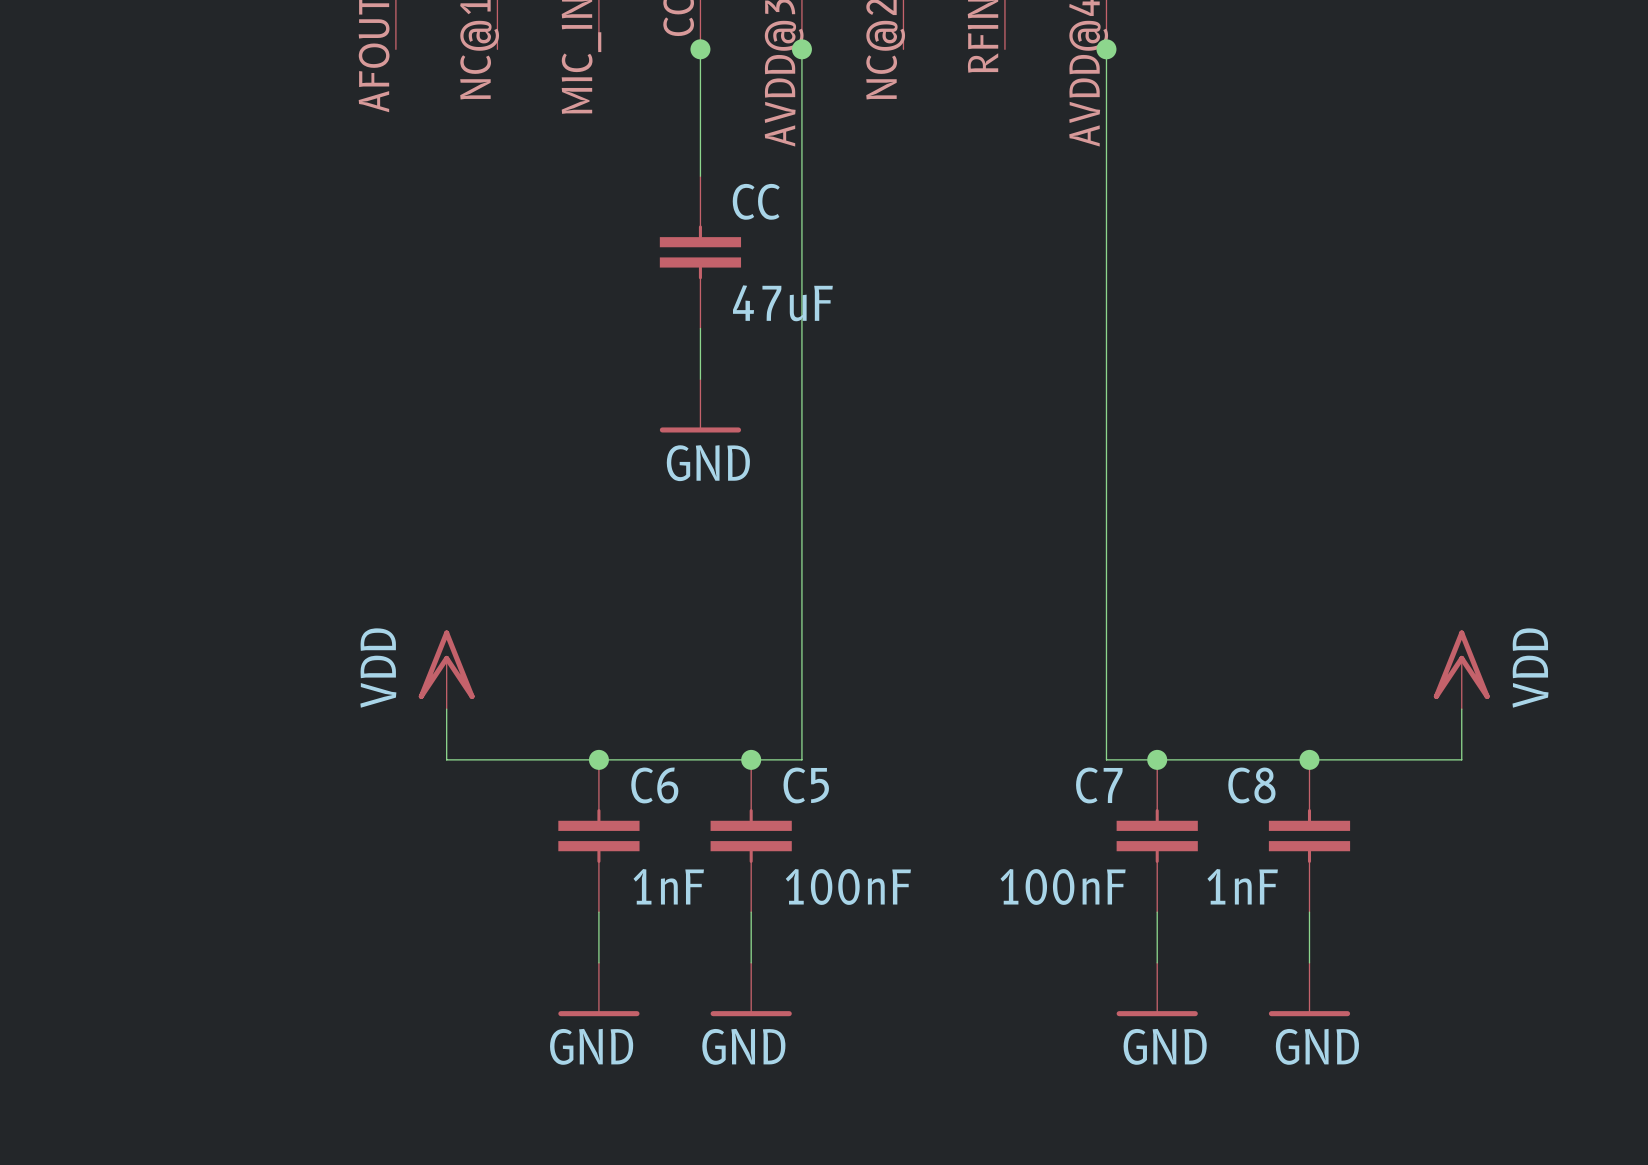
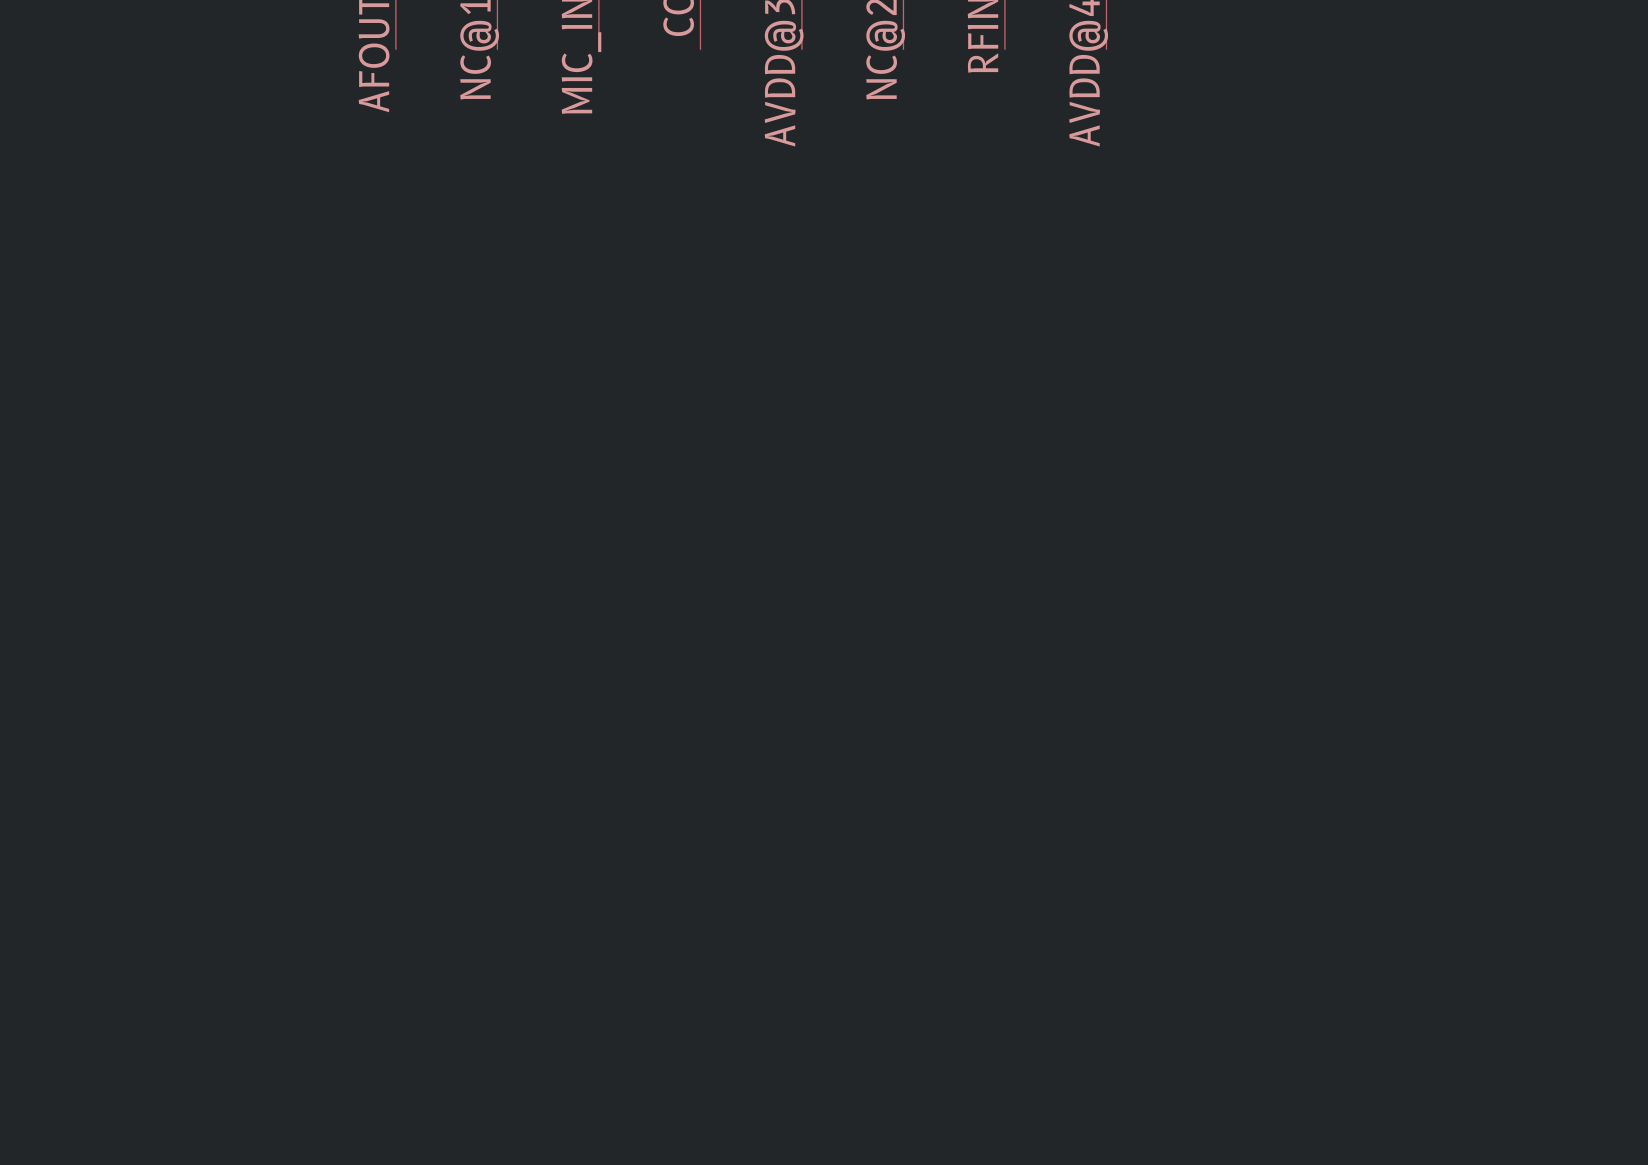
wire: (700, 49) (700, 176) -> none
junction: (700, 49) -> none
wire: (801, 49) (801, 759) (446, 759) (446, 709) -> none
junction: (801, 49) -> none
wire: (1106, 49) (1106, 759) (1461, 759) (1461, 709) -> none
junction: (1106, 49) -> none
CC: 47uF (700, 252) -> none
wire: (700, 328) (700, 379) -> none
power symbol: GND (700, 405) -> none
power symbol: VDD (446, 669) -> none
power symbol: VDD (1461, 669) -> none
junction: (598, 759) -> none
junction: (751, 759) -> none
junction: (1157, 759) -> none
junction: (1309, 759) -> none
C6: 1nF (598, 836) -> none
C5: 100nF (751, 836) -> none
C7: 100nF (1157, 836) -> none
C8: 1nF (1309, 836) -> none
wire: (598, 912) (598, 962) -> none
wire: (751, 912) (751, 962) -> none
wire: (1157, 912) (1157, 962) -> none
wire: (1309, 912) (1309, 962) -> none
power symbol: GND (598, 989) -> none
power symbol: GND (751, 989) -> none
power symbol: GND (1157, 989) -> none
power symbol: GND (1309, 989) -> none

